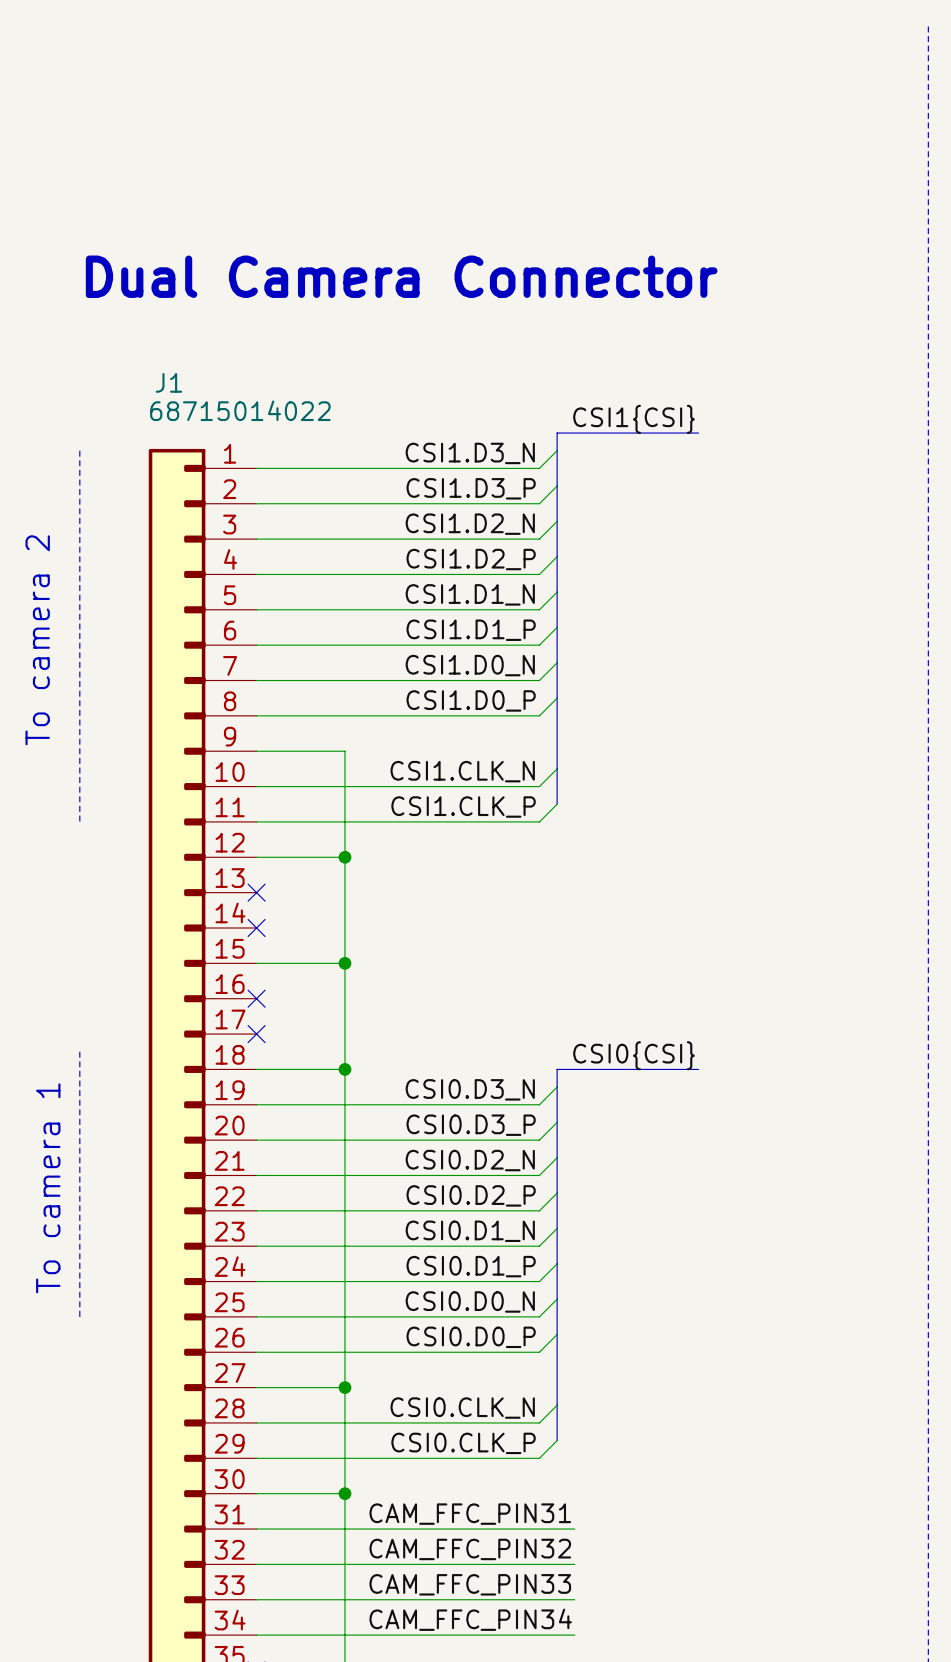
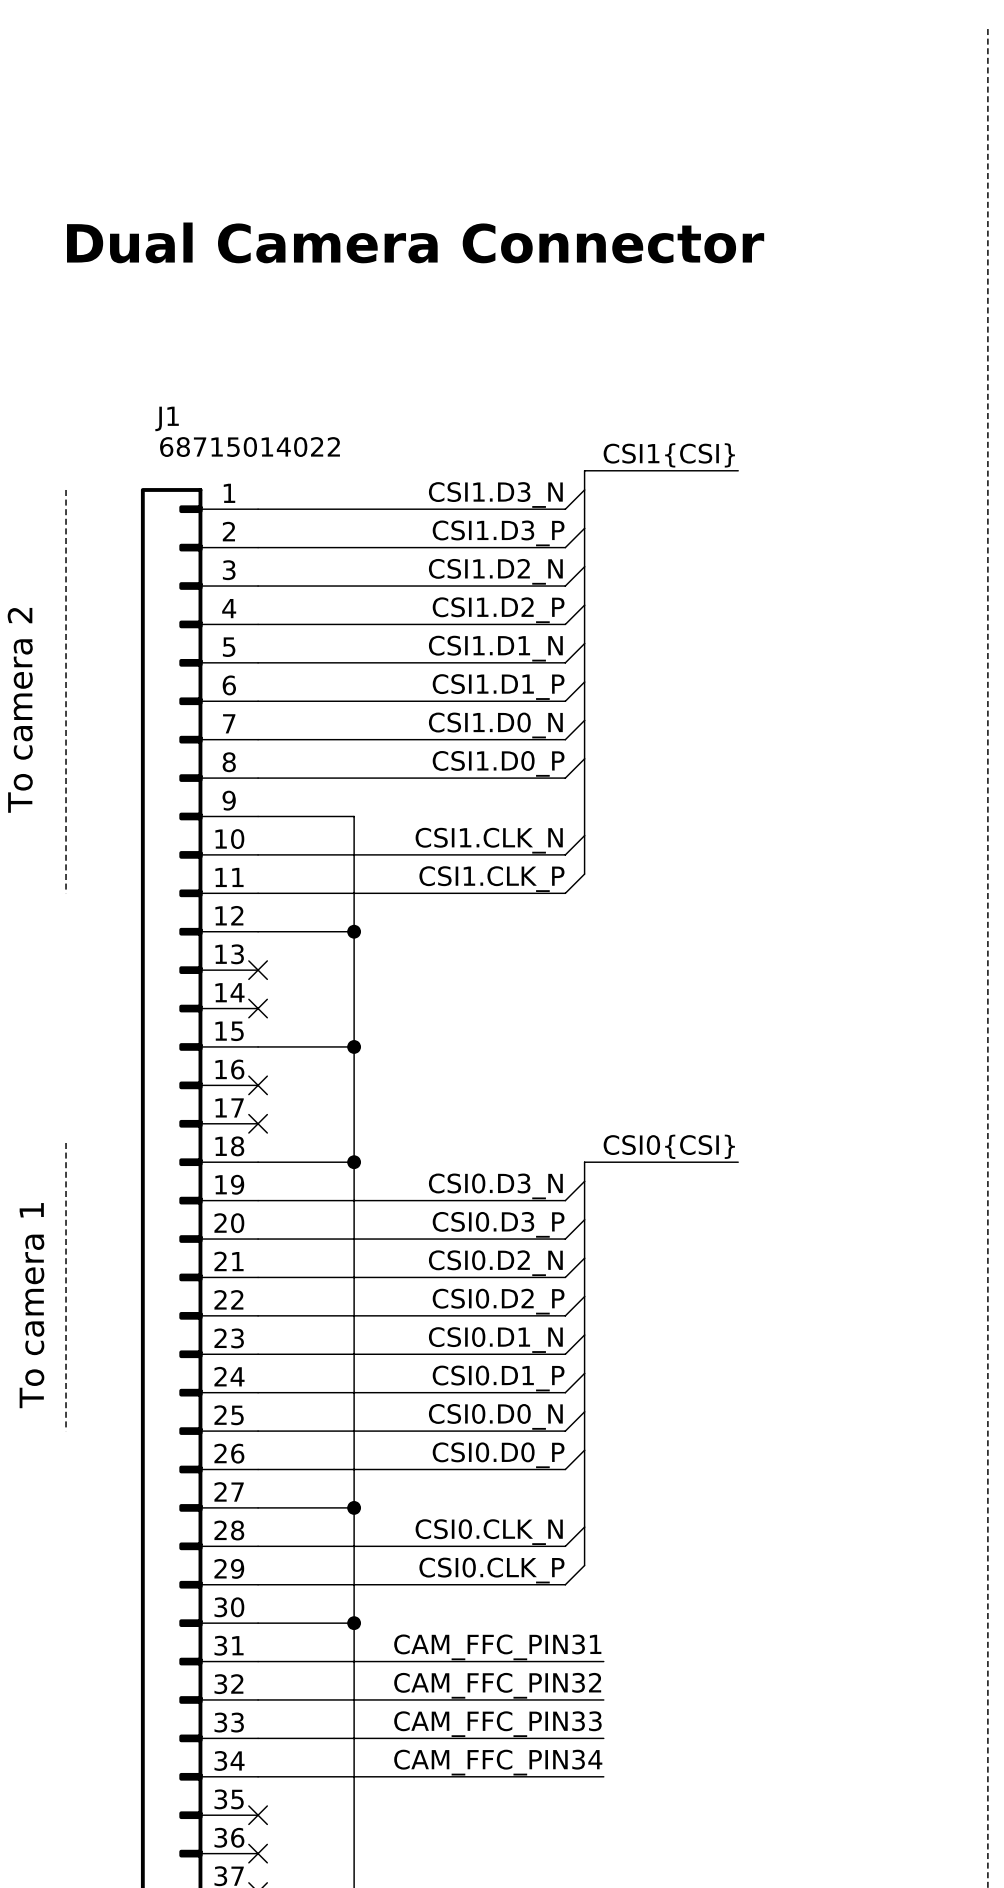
text position: Dual Camera Connector (401, 276) -> Dual Camera Connector (415, 242)

